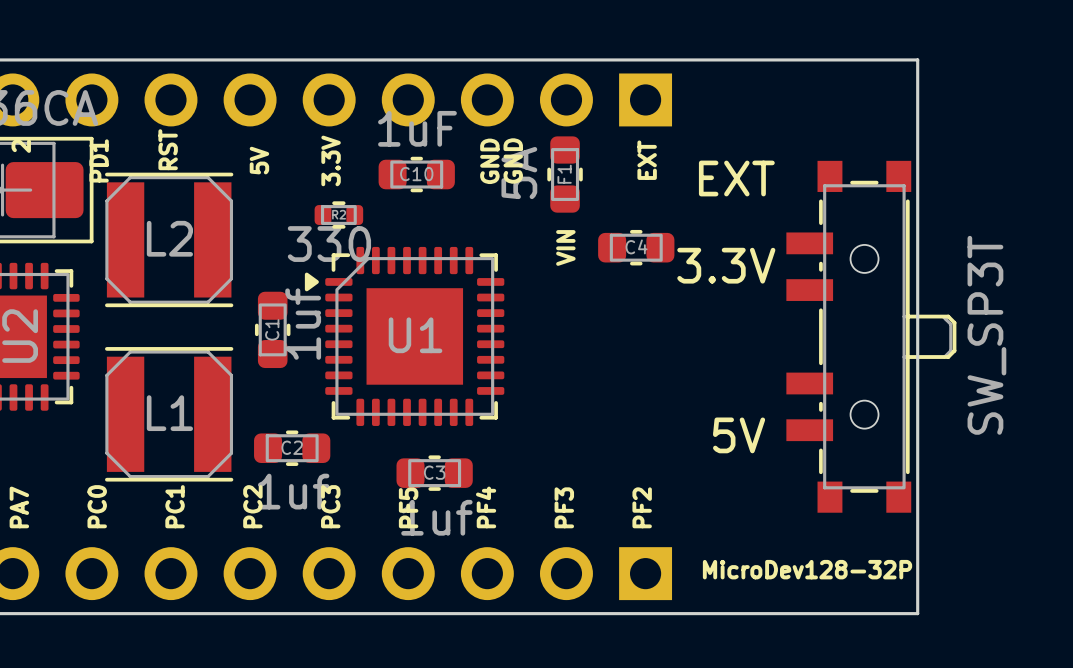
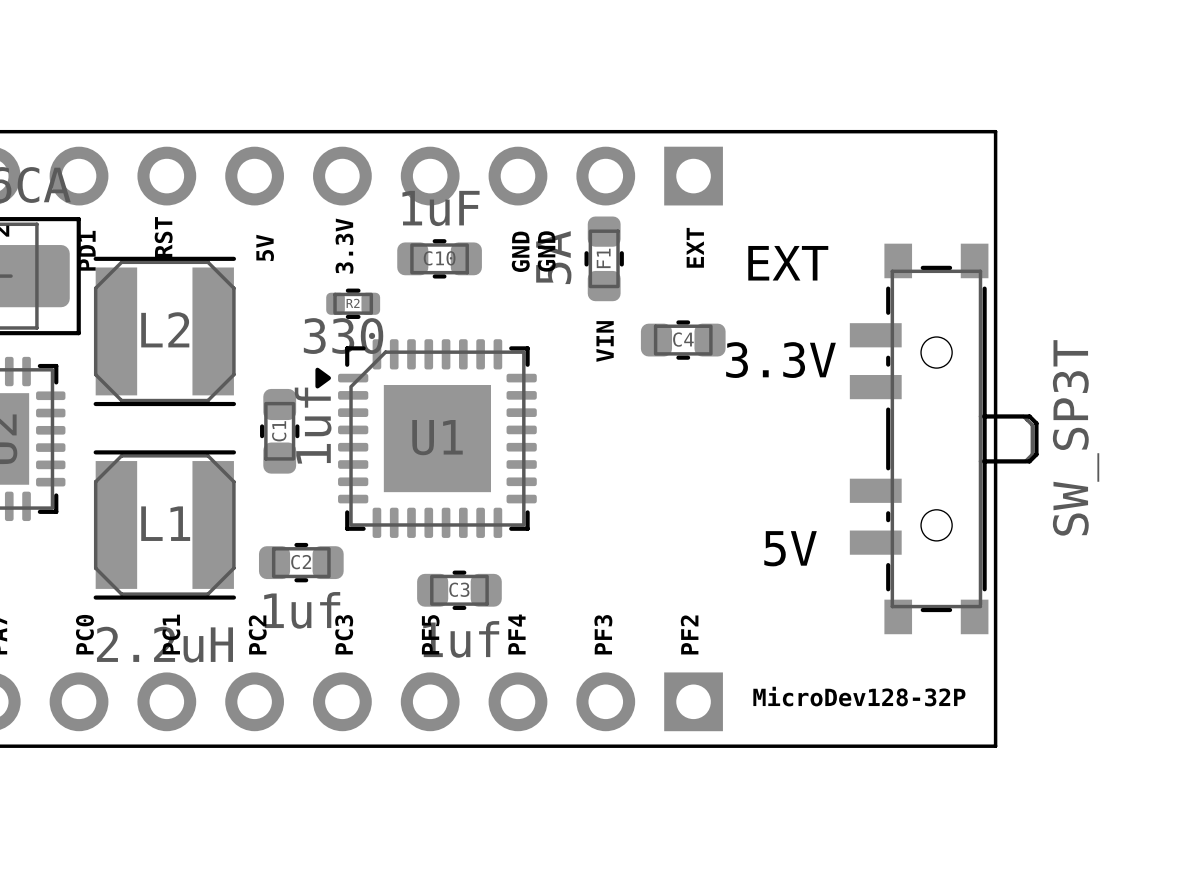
L1 value: none -> 2.2uH (164, 644)

